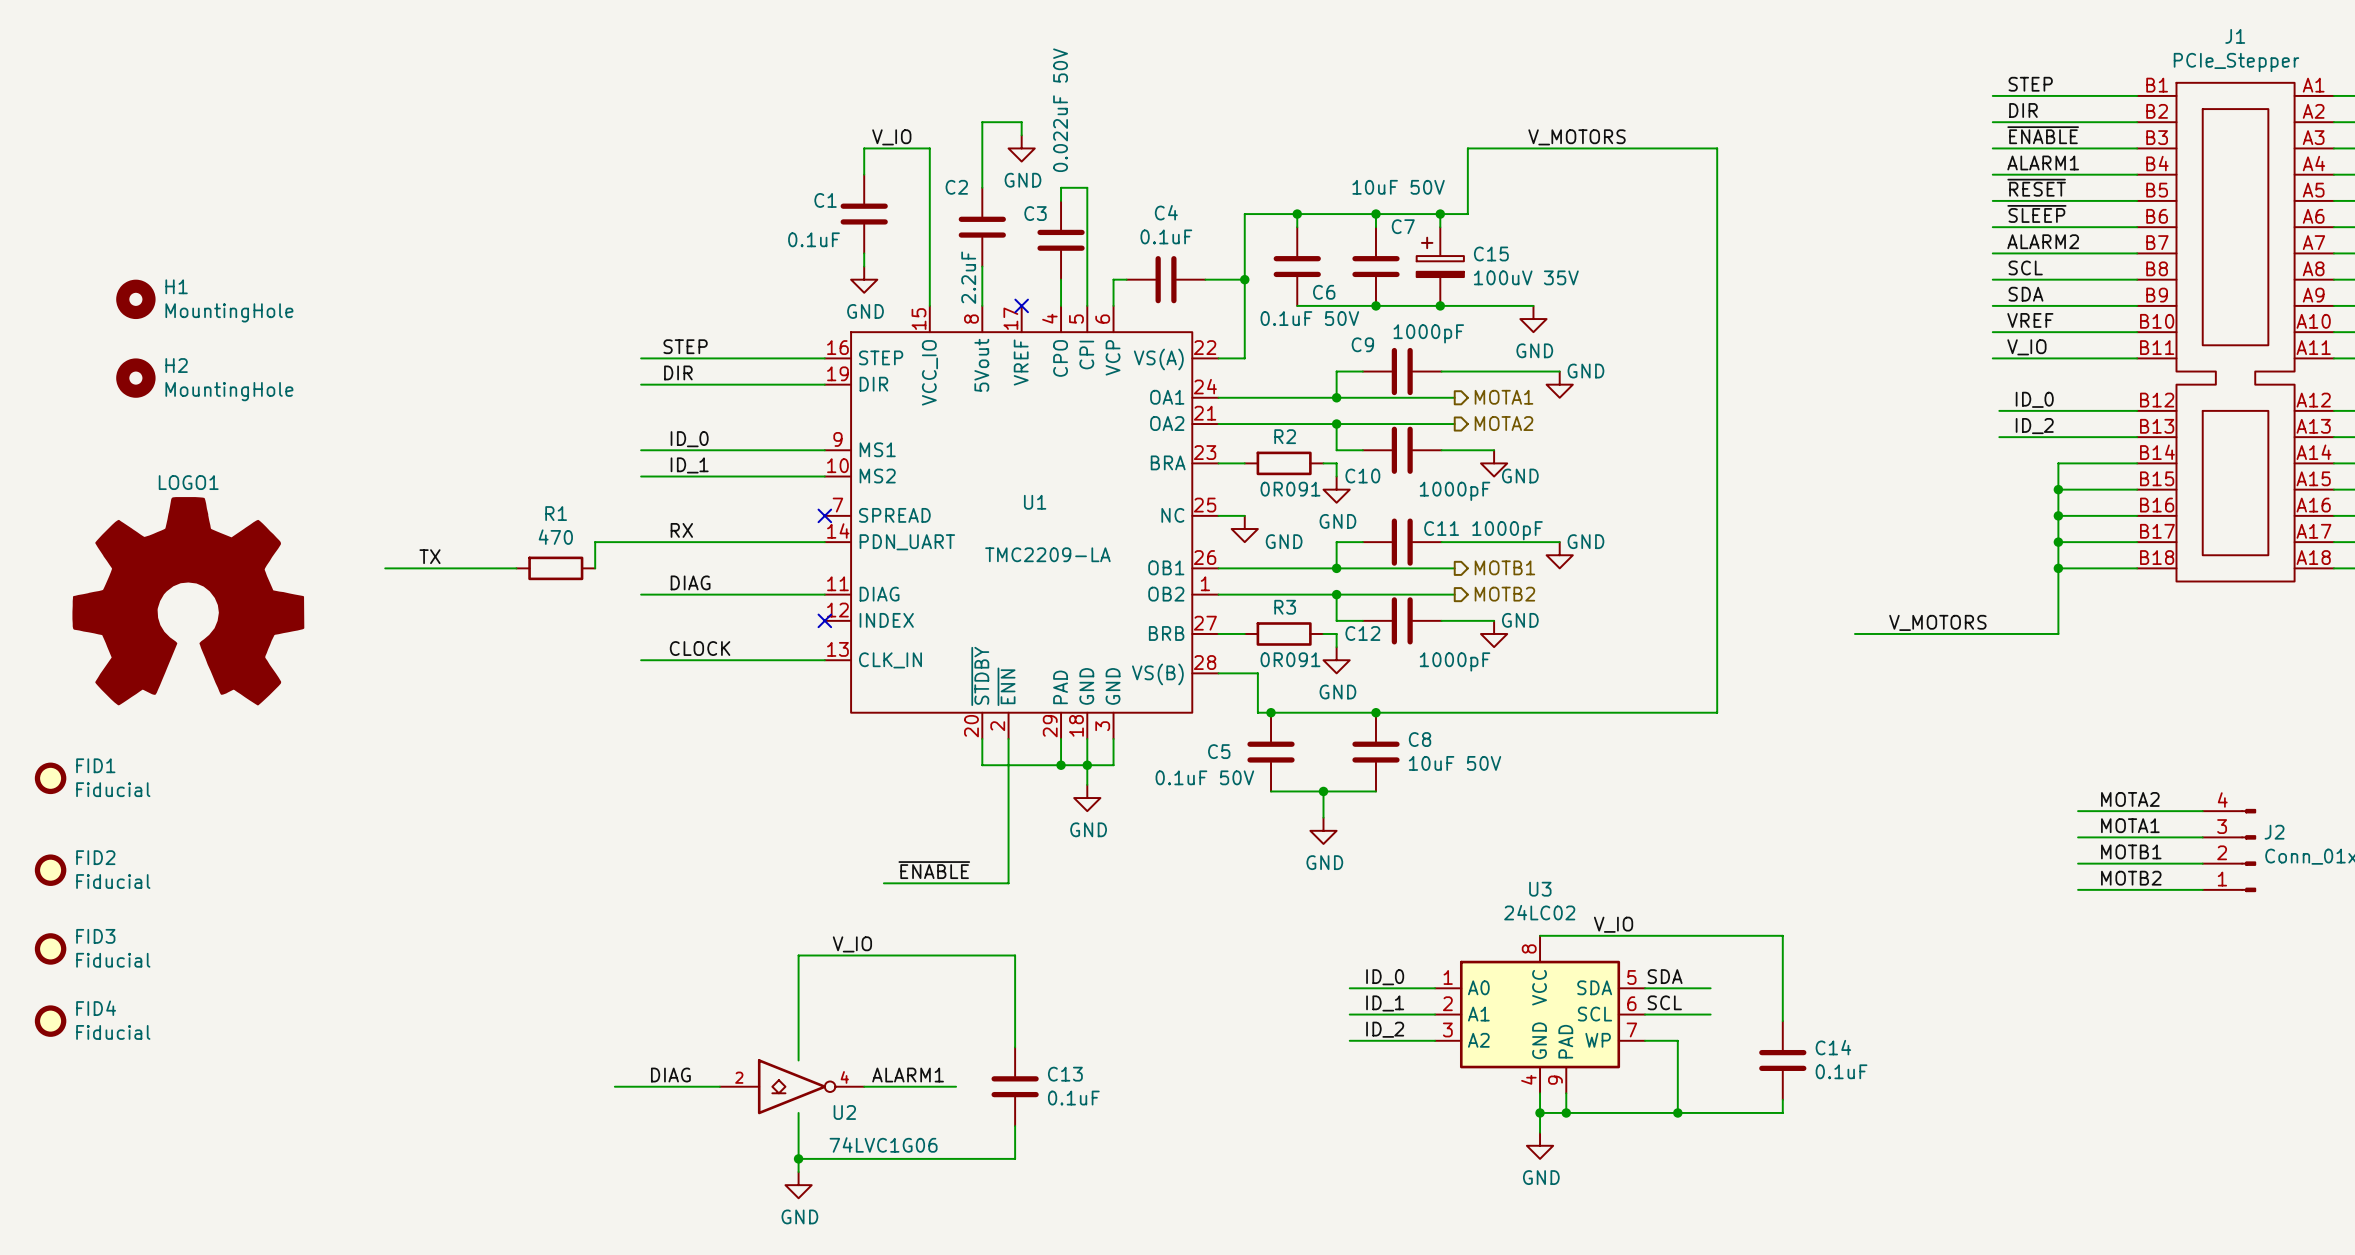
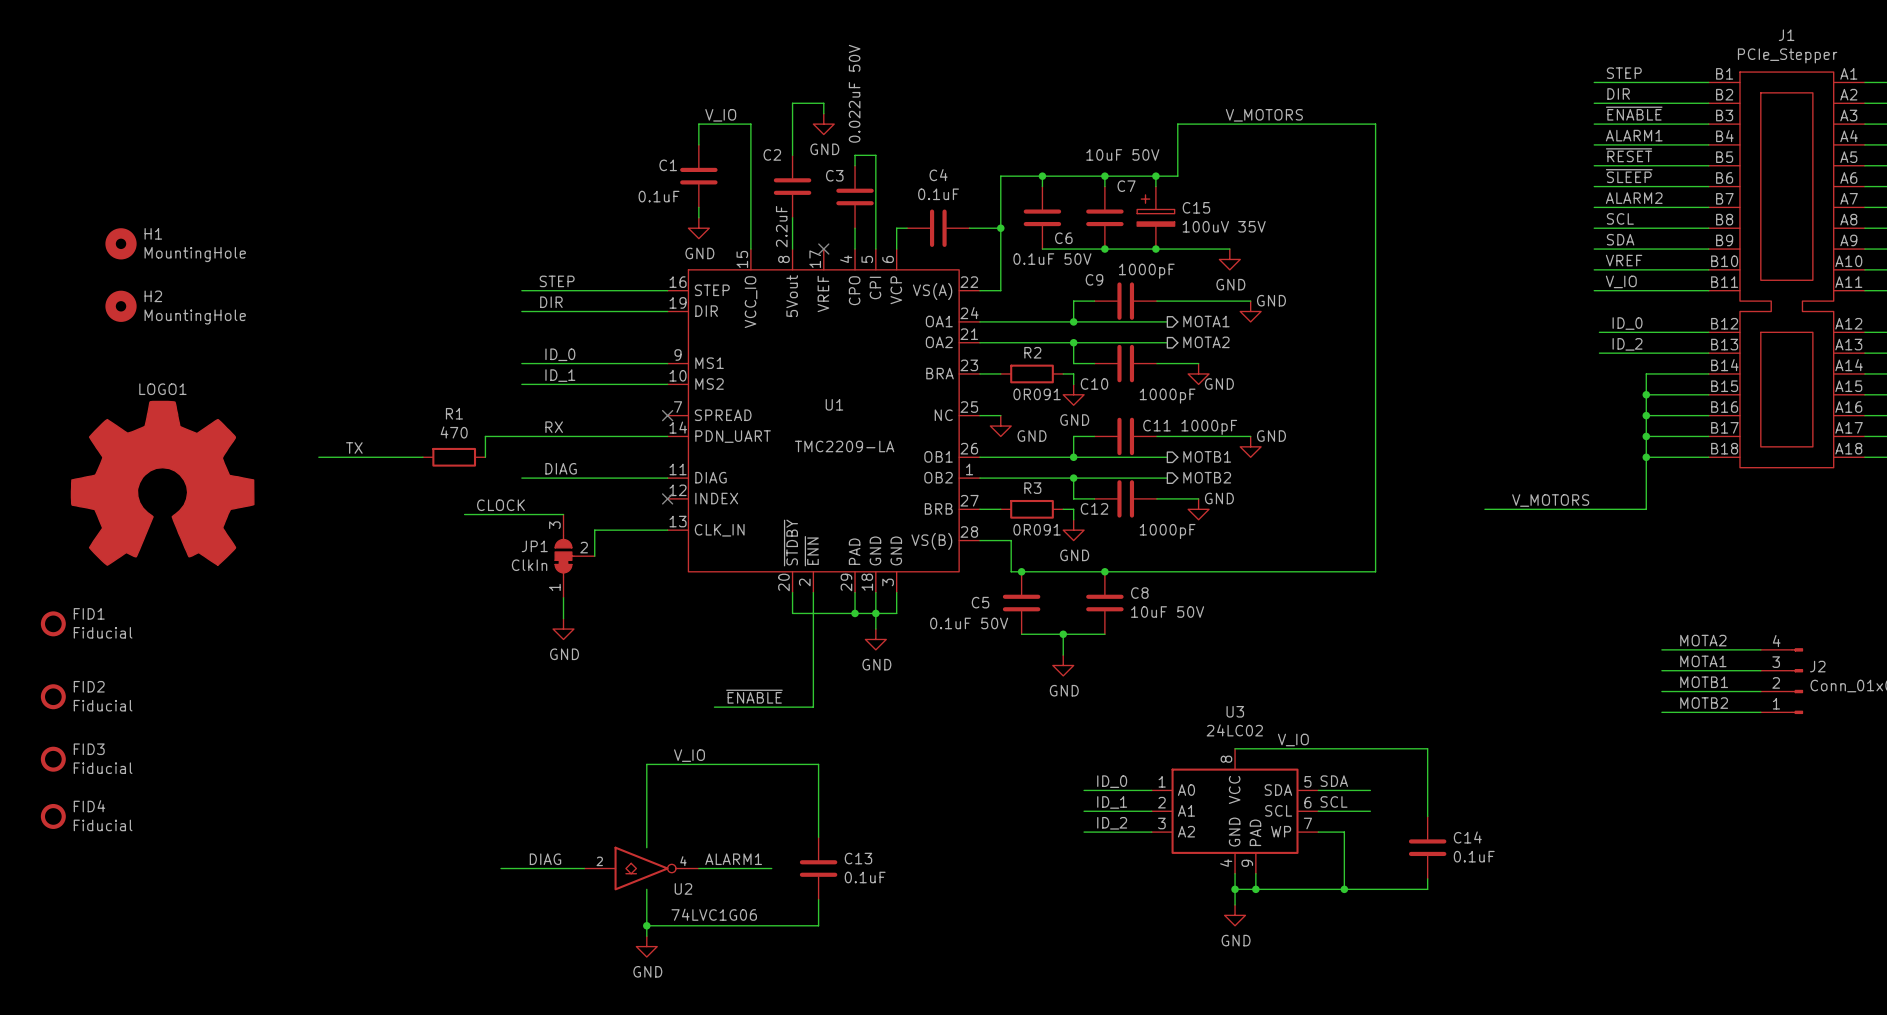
wire: none -> (464, 514) (563, 514)
label position: CLOCK (700, 648) -> CLOCK (500, 505)
wire: (641, 660) (732, 660) -> (594, 556) (594, 530)
JP1: none -> ClkIn (574, 556)
wire: none -> (563, 597) (563, 618)
power symbol: none -> GND (563, 629)

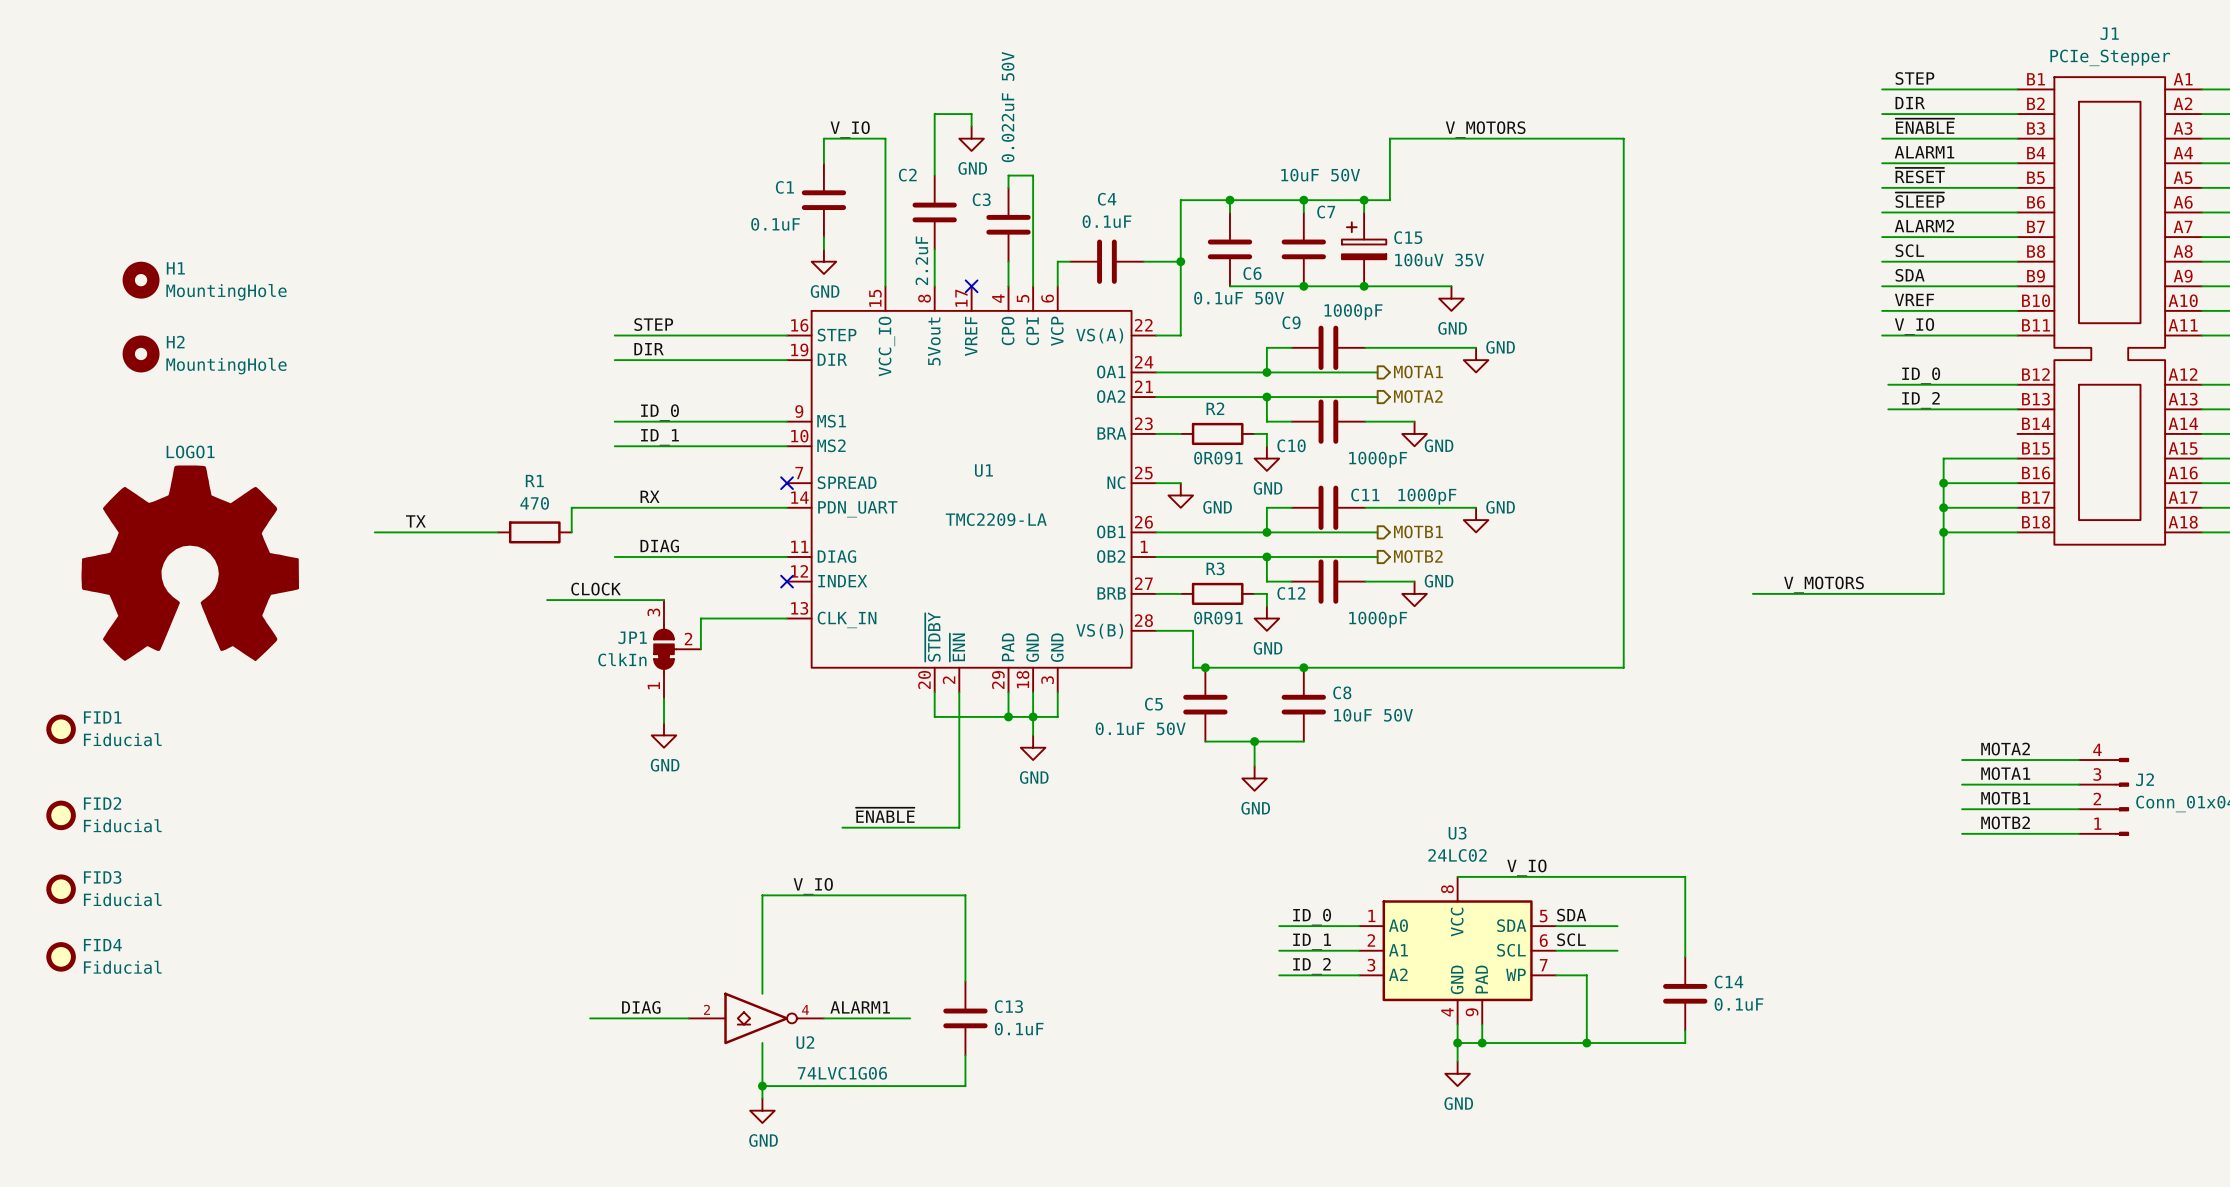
wire: (1708, 373) (1646, 373) (1646, 394) -> none
junction: (1646, 394) -> none

